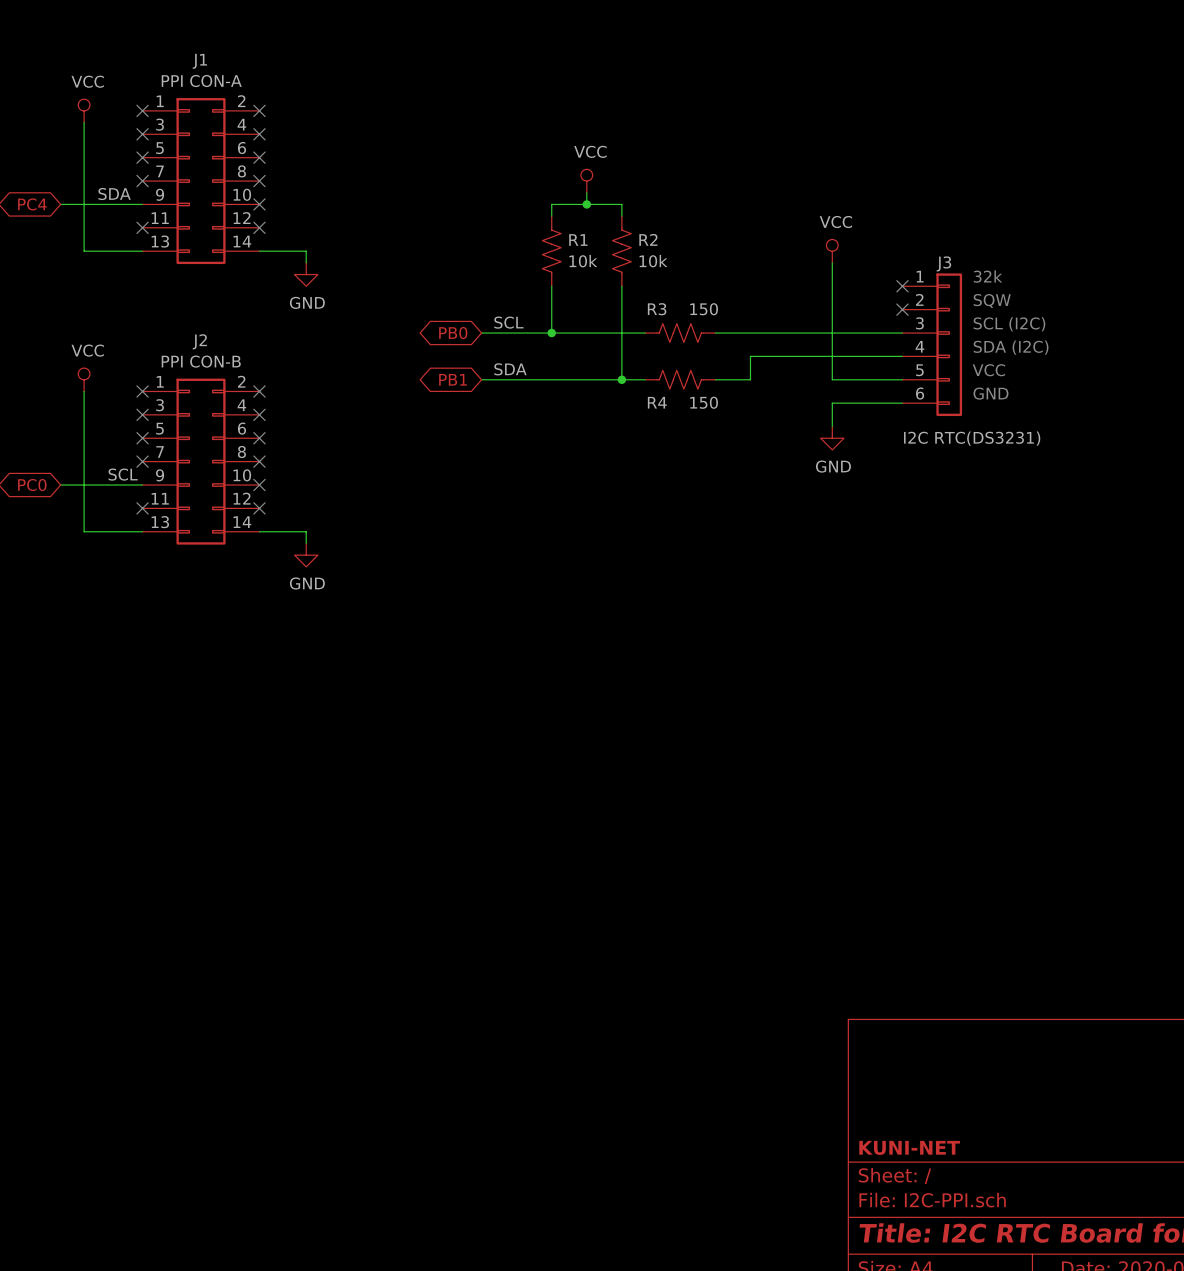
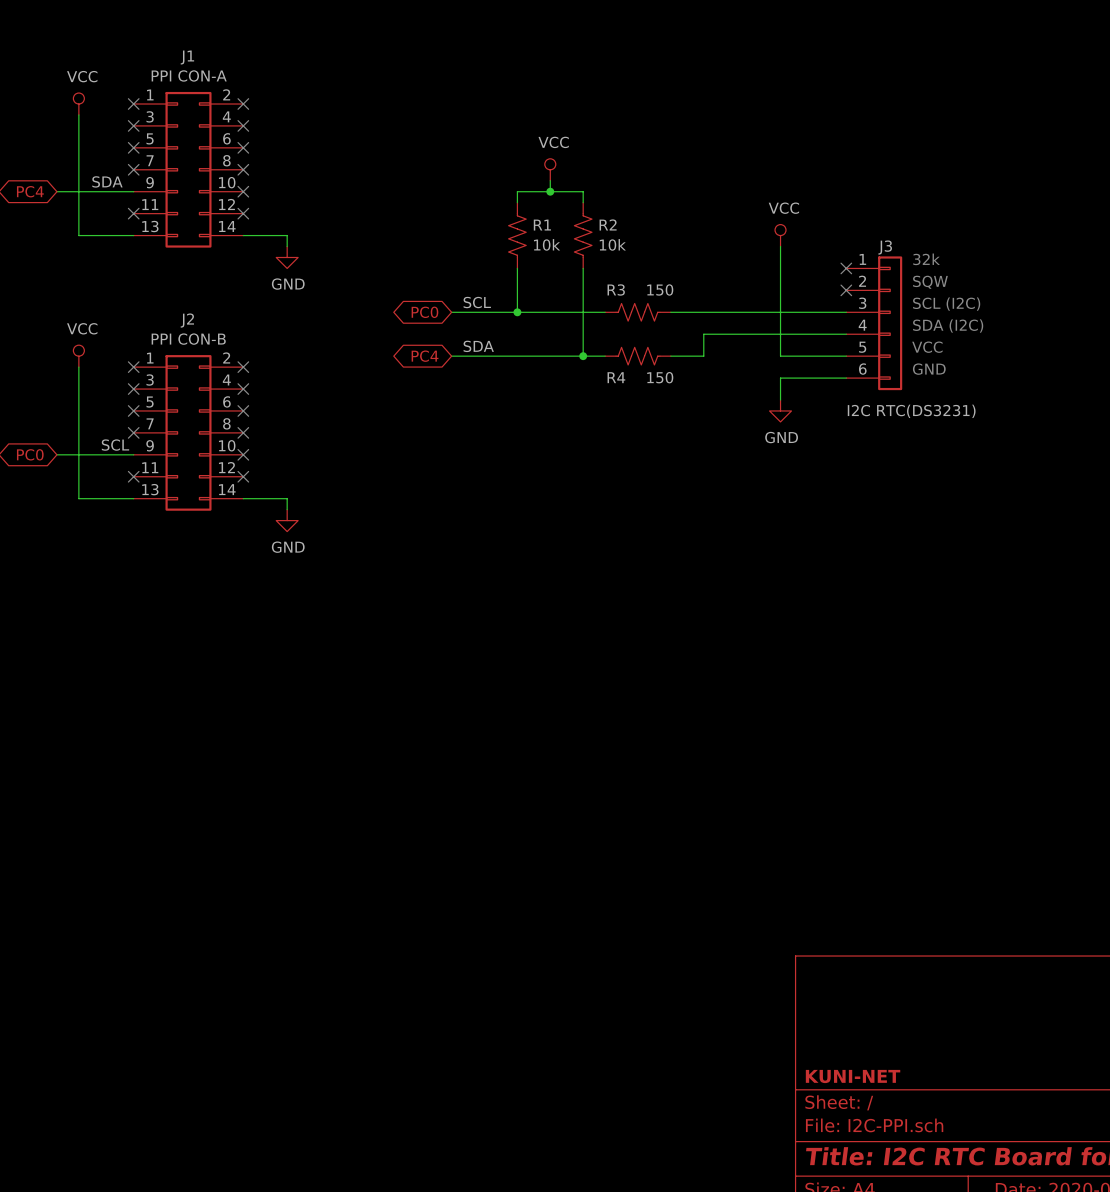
global label: PB0 (453, 333) -> PC0 (424, 312)
global label: PB1 (453, 379) -> PC4 (425, 356)

